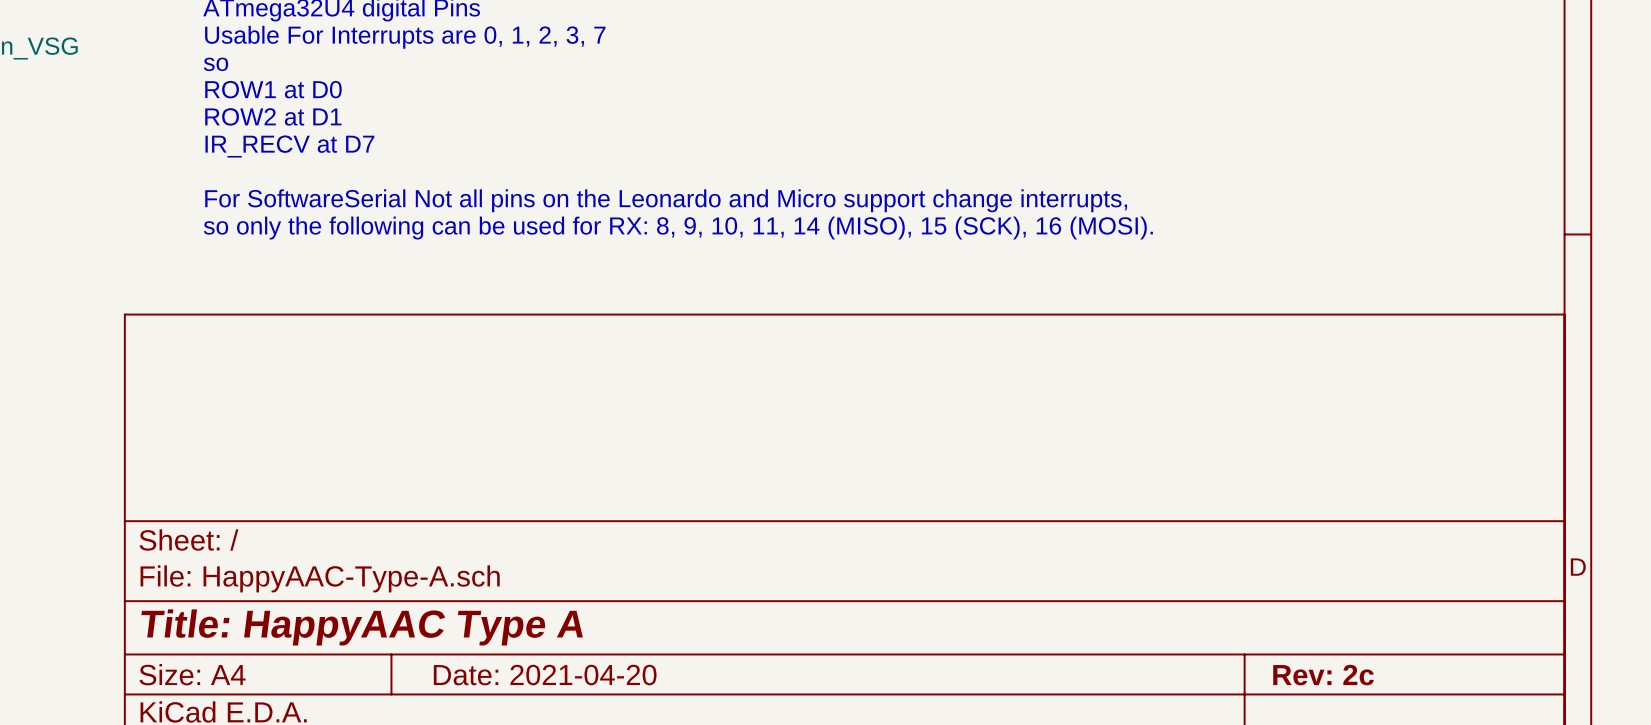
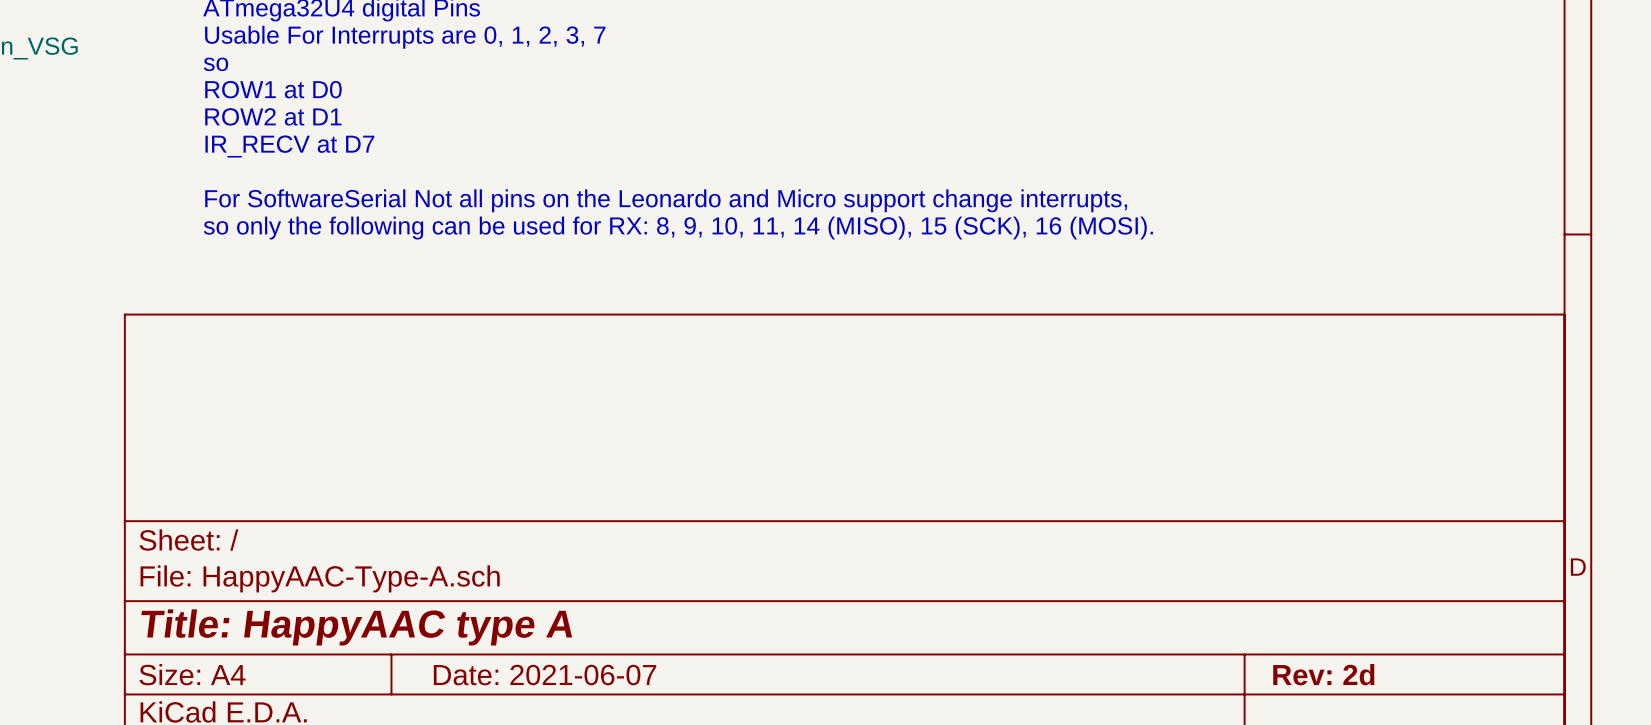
title block: Title: HappyAAC Type A (362, 627) -> Title: HappyAAC type A (356, 627)
title block: Date: 2021-04-20 (545, 675) -> Date: 2021-06-07 (545, 675)
title block: Rev: 2c (1323, 675) -> Rev: 2d (1323, 674)

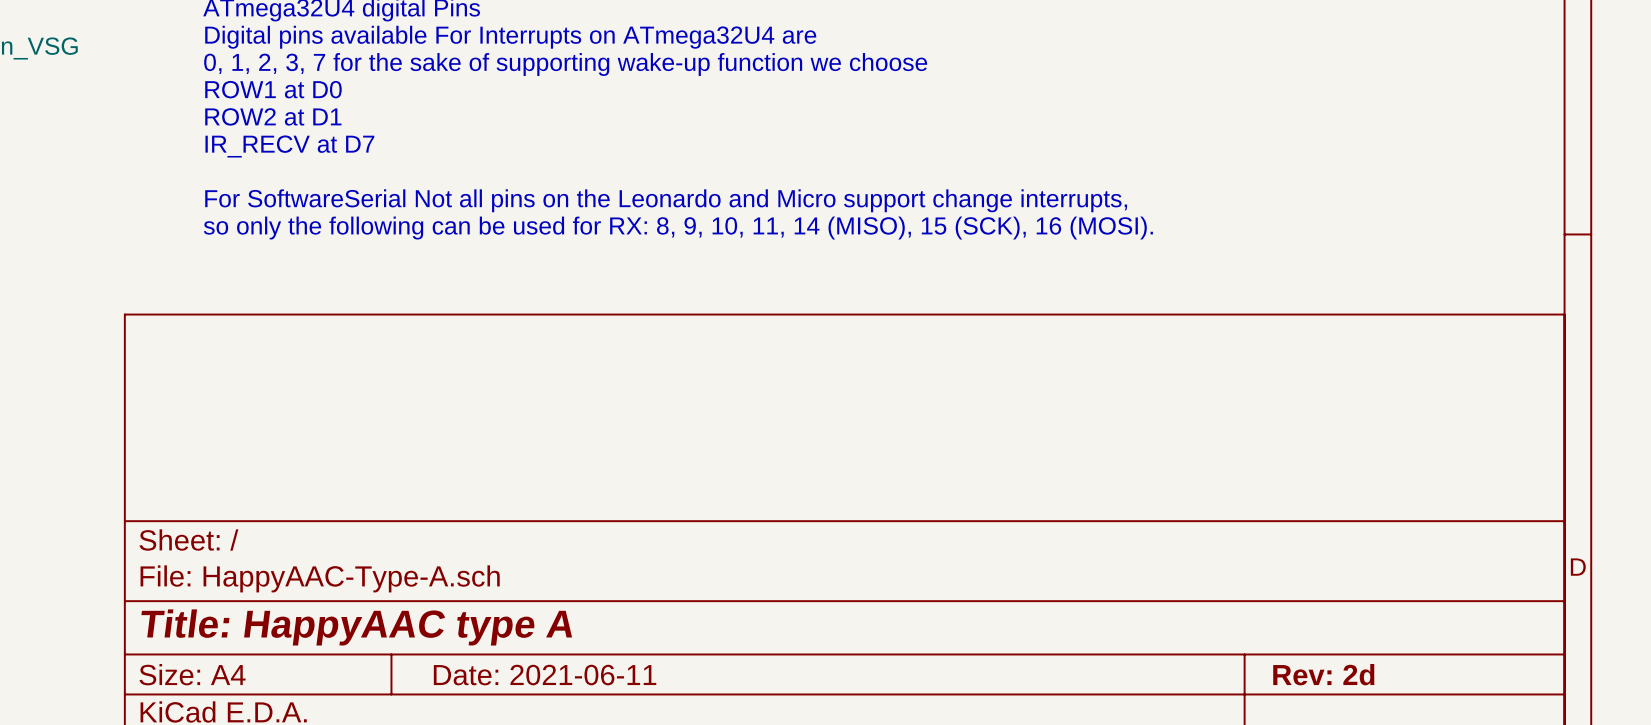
text: Usable For Interrupts are 0, 1, 2, 3, 7 (405, 37) -> Digital pins available For Interrupts on ATmega32U4 are (510, 37)
text: so (216, 64) -> 0, 1, 2, 3, 7 for the sake of supporting wake-up function we choose (565, 64)
title block: Date: 2021-06-07 (545, 675) -> Date: 2021-06-11 (545, 675)

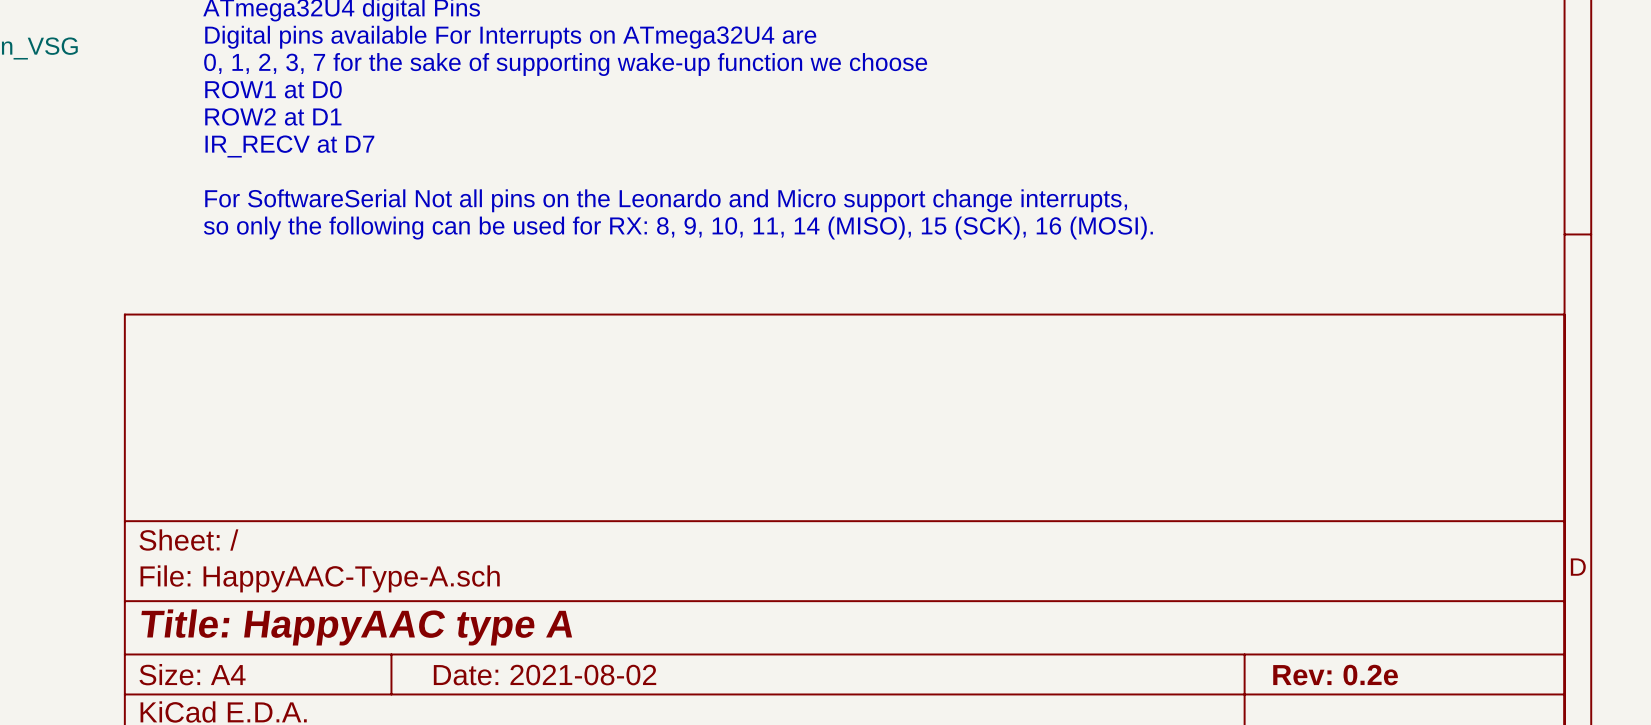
title block: Rev: 2d (1323, 674) -> Rev: 0.2e (1335, 675)
title block: Date: 2021-06-11 (545, 675) -> Date: 2021-08-02 (545, 675)

